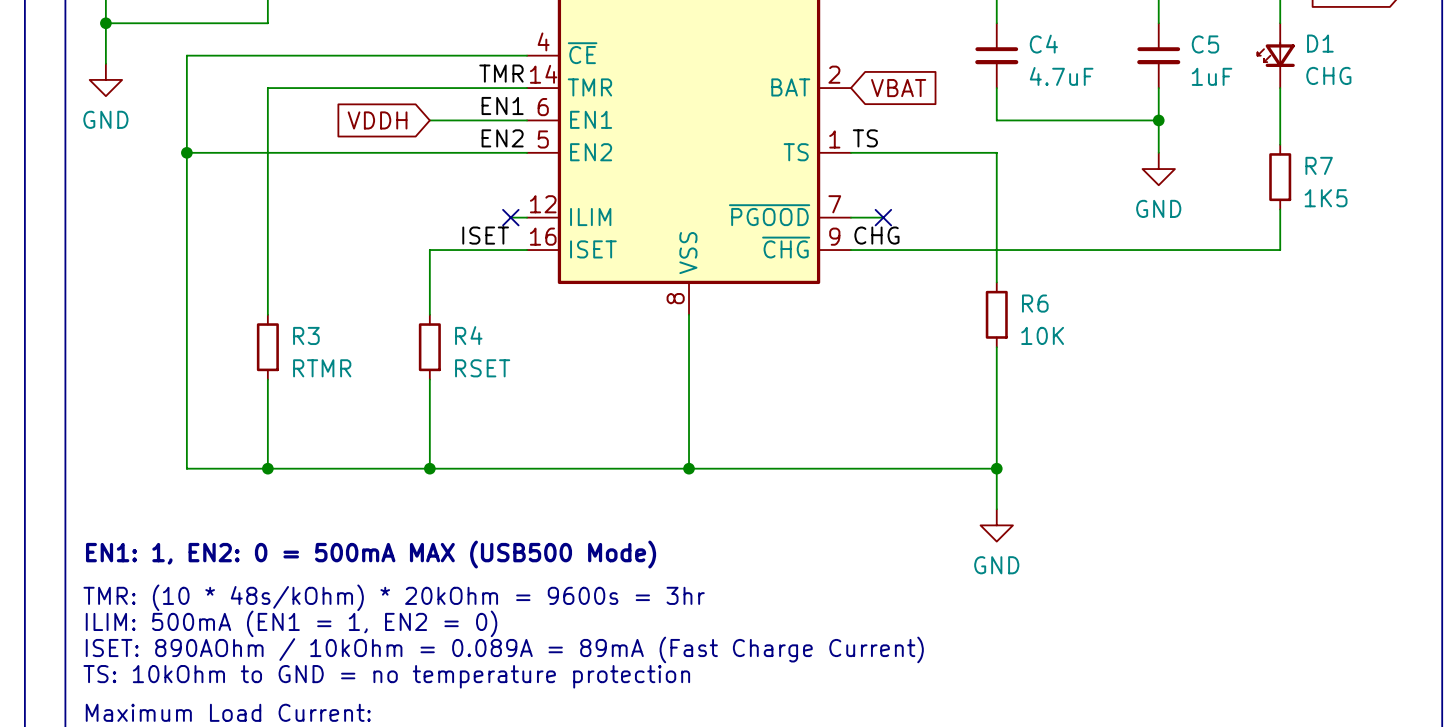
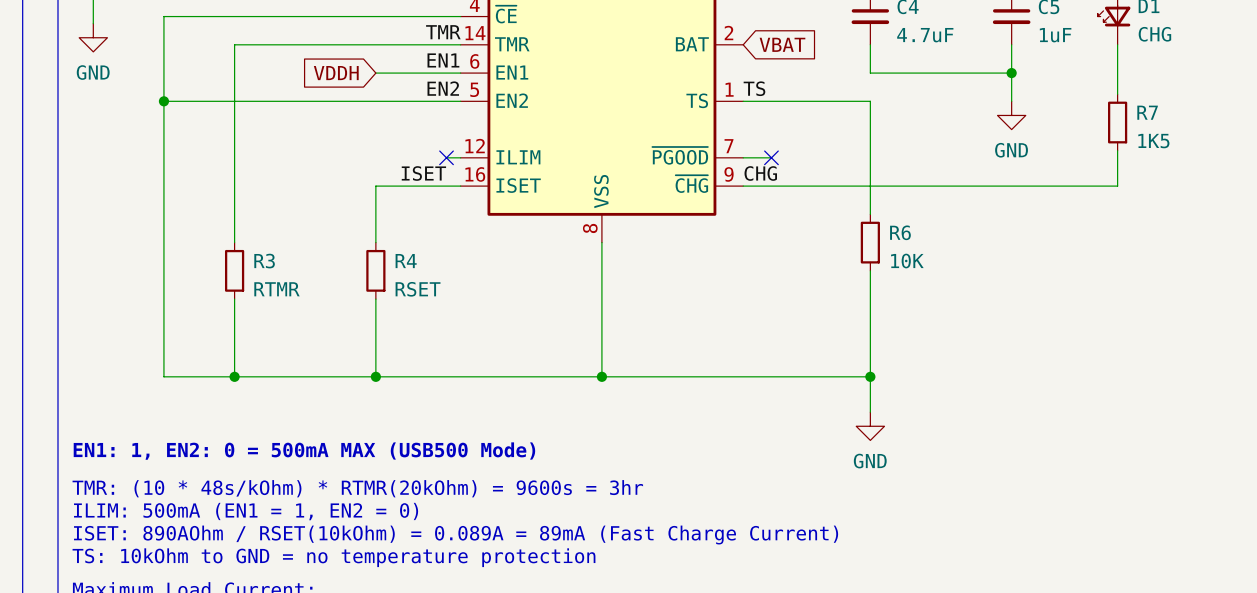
text: TMR: (10 * 48s/kOhm) * 20kOhm = 9600s = 3hr (394, 597) -> TMR: (10 * 48s/kOhm) * RTMR(20kOhm) = 9600s = 3hr (357, 488)
text: ISET: 890AOhm / 10kOhm = 0.089A = 89mA (Fast Charge Current) (504, 649) -> ISET: 890AOhm / RSET(10kOhm) = 0.089A = 89mA (Fast Charge Current) (456, 535)

